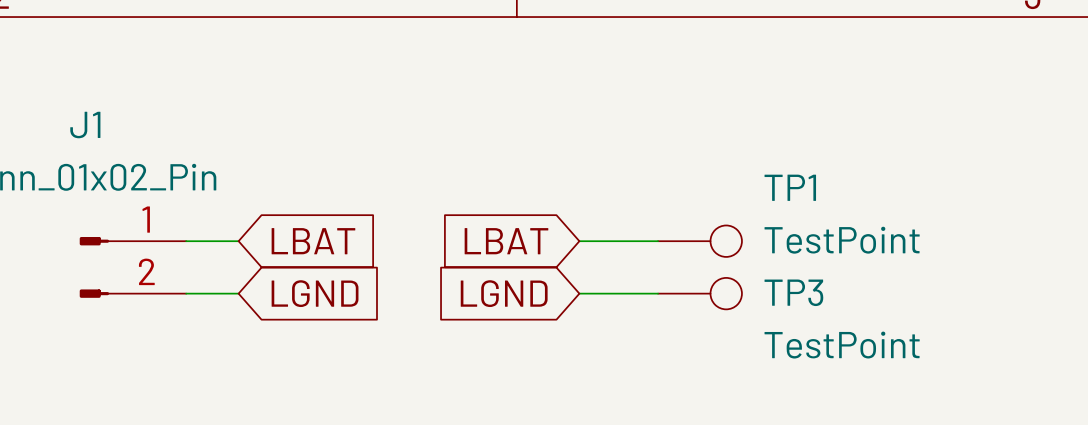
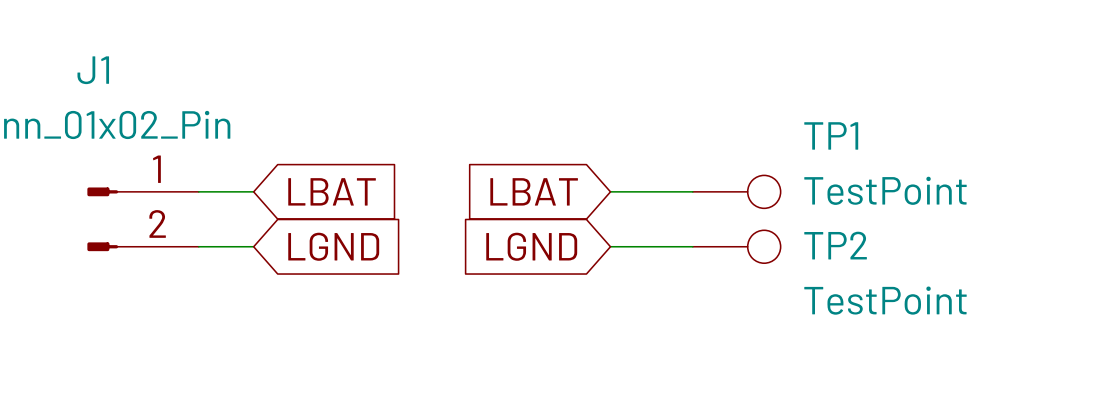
TP3 name: TP3 (793, 292) -> TP2 (835, 245)

